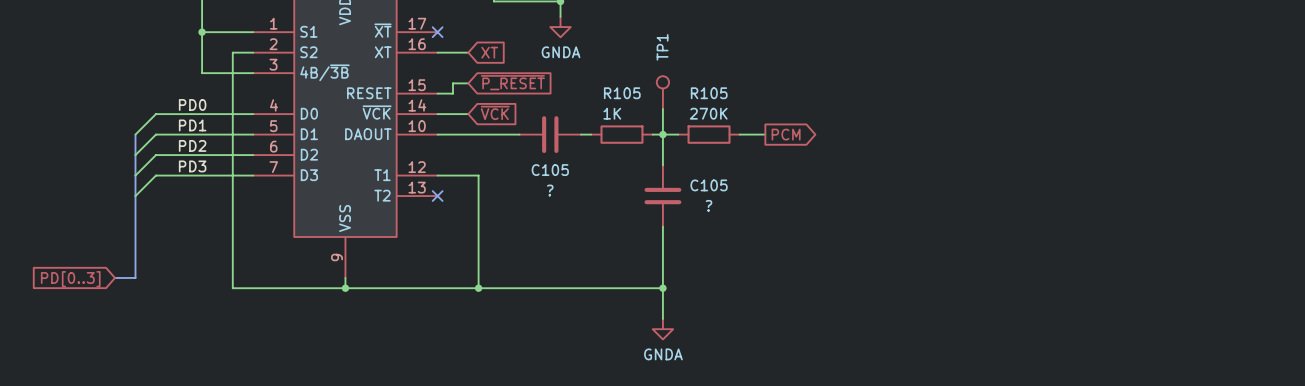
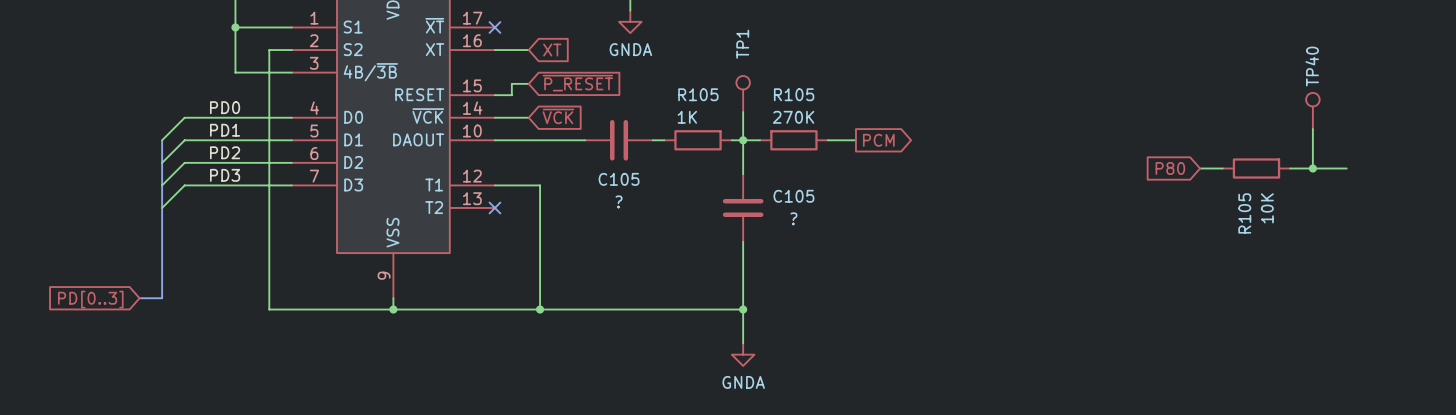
TP40: none -> (1312, 110)
wire: none -> (1312, 129) (1312, 168)
global label: none -> P80 (1170, 168)
wire: none -> (1200, 168) (1222, 168)
R105: none -> 10K (1256, 168)
wire: none -> (1290, 168) (1346, 168)
junction: none -> (1312, 168)

